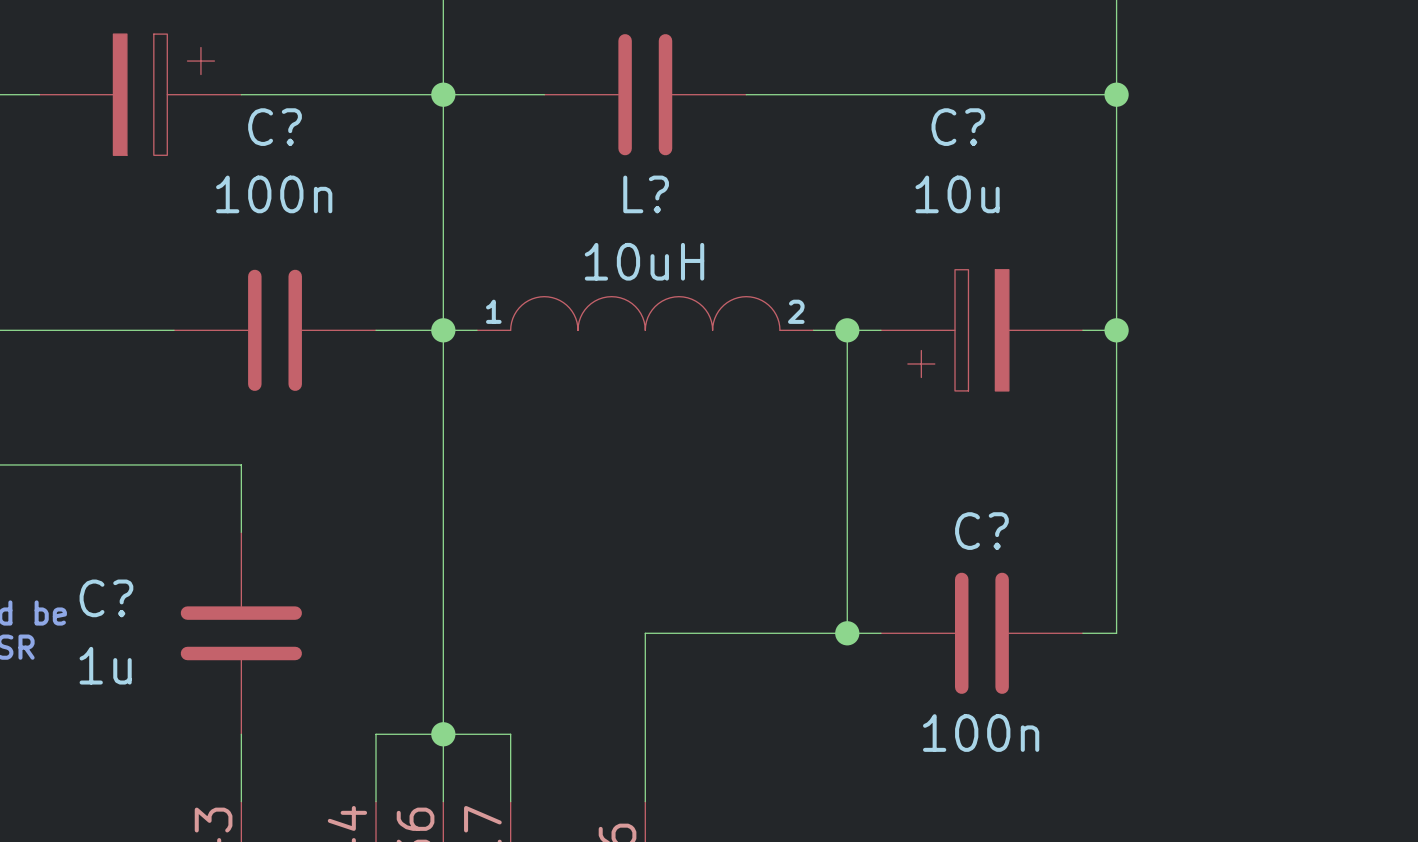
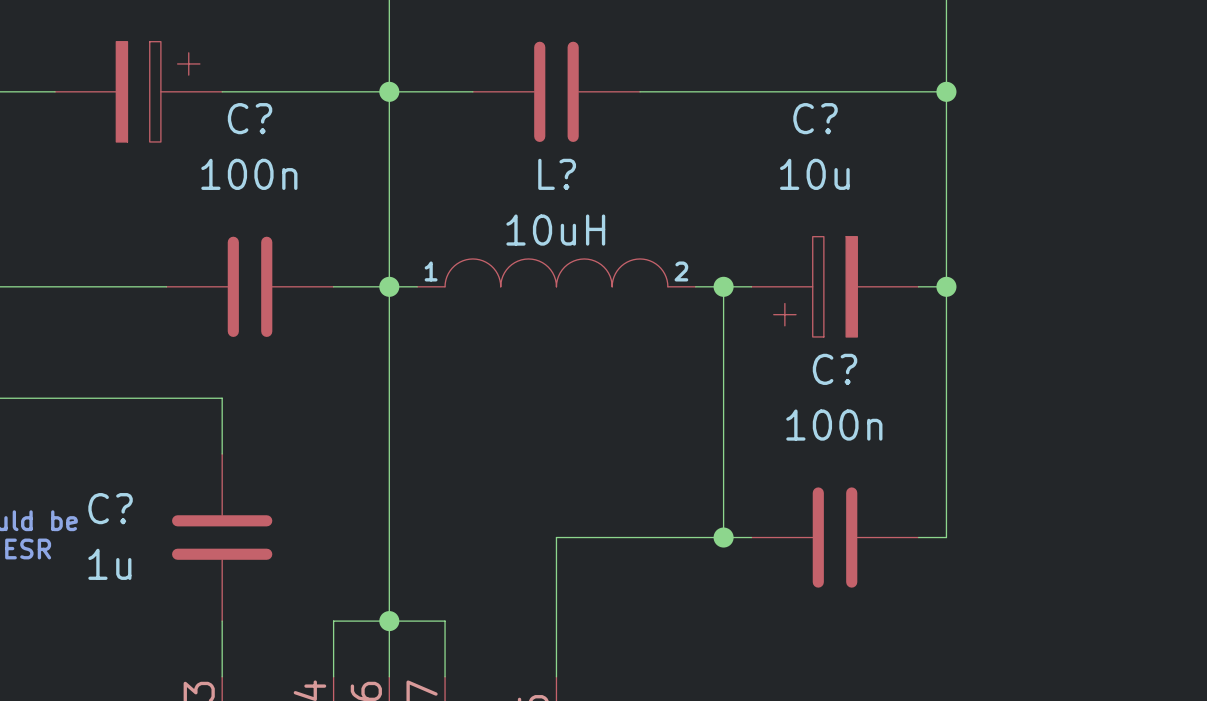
C? name position: C? (981, 531) -> C? (835, 369)
C? value position: 100n (981, 733) -> 100n (834, 425)

